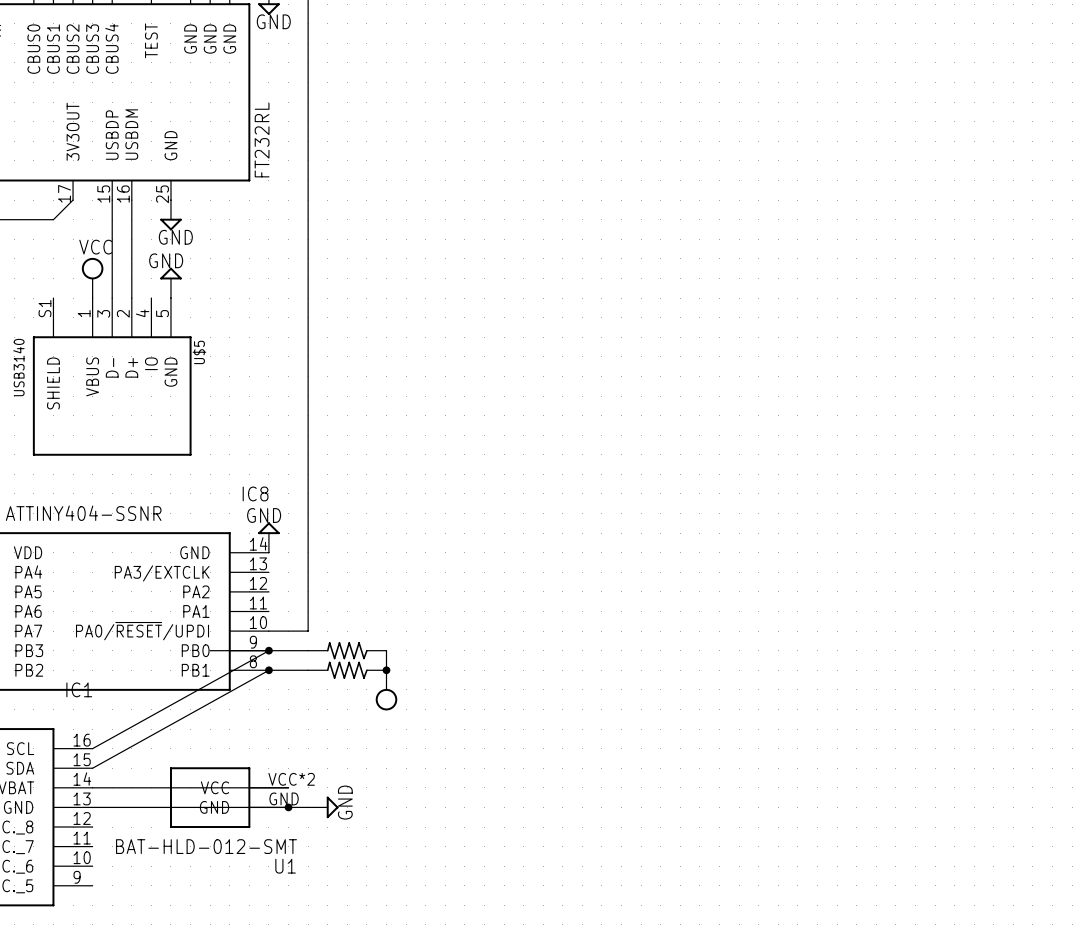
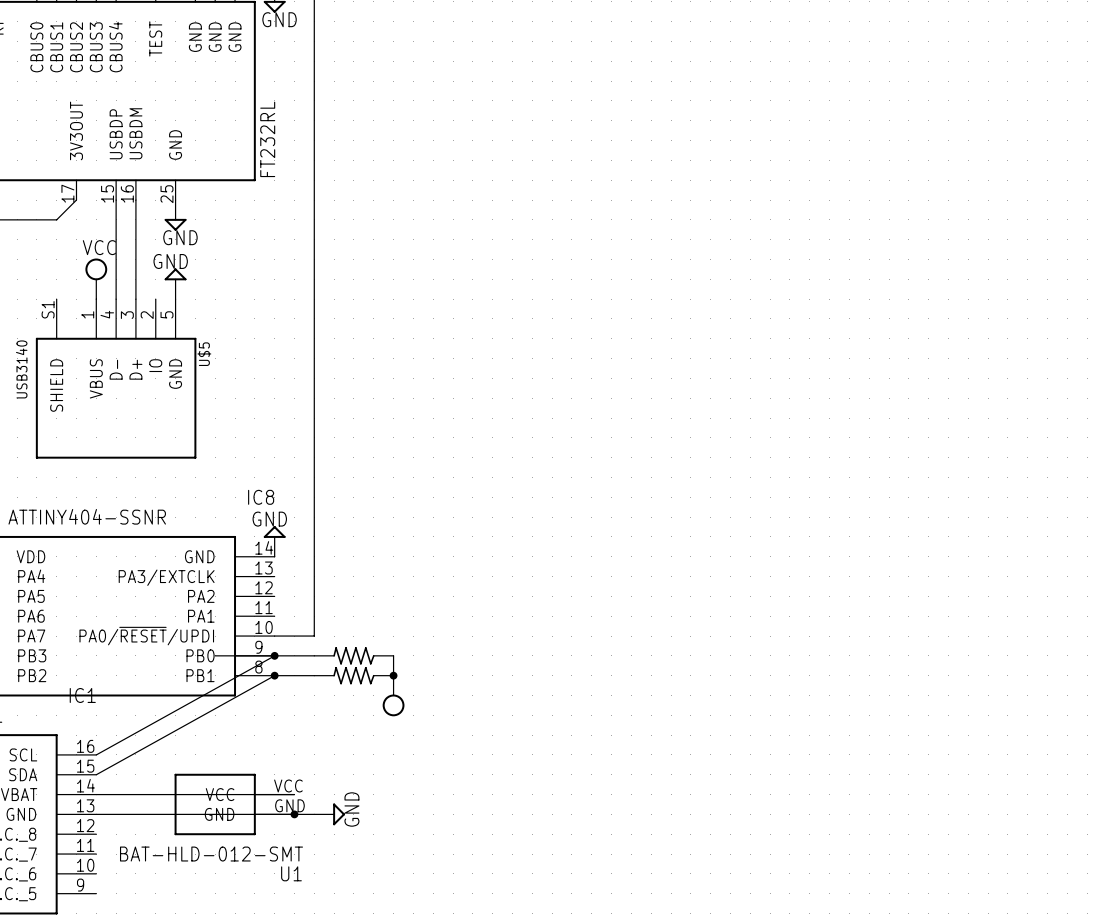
U$5 pin number: 3 (103, 313) -> 4 (107, 314)
U$5 pin number: 2 (123, 313) -> 3 (127, 315)
U$5 pin number: 4 (142, 313) -> 2 (147, 315)
U1 pin number: VCC*2 (291, 779) -> VCC (288, 785)

